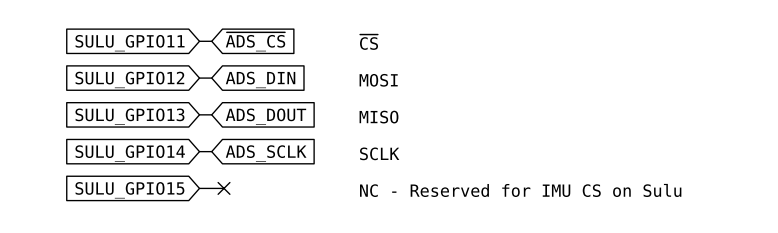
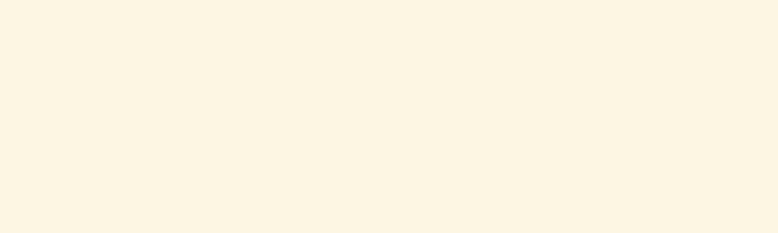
wire: (199, 41) (211, 41) -> none
global label: ~{ADS_CS} (255, 41) -> none
text: ~{CS} (369, 42) -> none
global label: SULU_GPIO11 (130, 43) -> none
wire: (199, 78) (211, 78) -> none
global label: SULU_GPIO12 (129, 79) -> none
global label: ADS_DIN (260, 79) -> none
text: MOSI (378, 80) -> none
wire: (199, 114) (211, 114) -> none
global label: SULU_GPIO13 (129, 116) -> none
global label: ADS_DOUT (266, 116) -> none
text: MISO (378, 117) -> none
wire: (199, 151) (211, 151) -> none
global label: SULU_GPIO14 (130, 153) -> none
global label: ADS_SCLK (266, 153) -> none
text: SCLK (379, 153) -> none
wire: (199, 188) (224, 188) -> none
no-connect mark: (224, 188) -> none
global label: SULU_GPIO15 (129, 190) -> none
text: NC - Reserved for IMU CS on Sulu (520, 190) -> none

